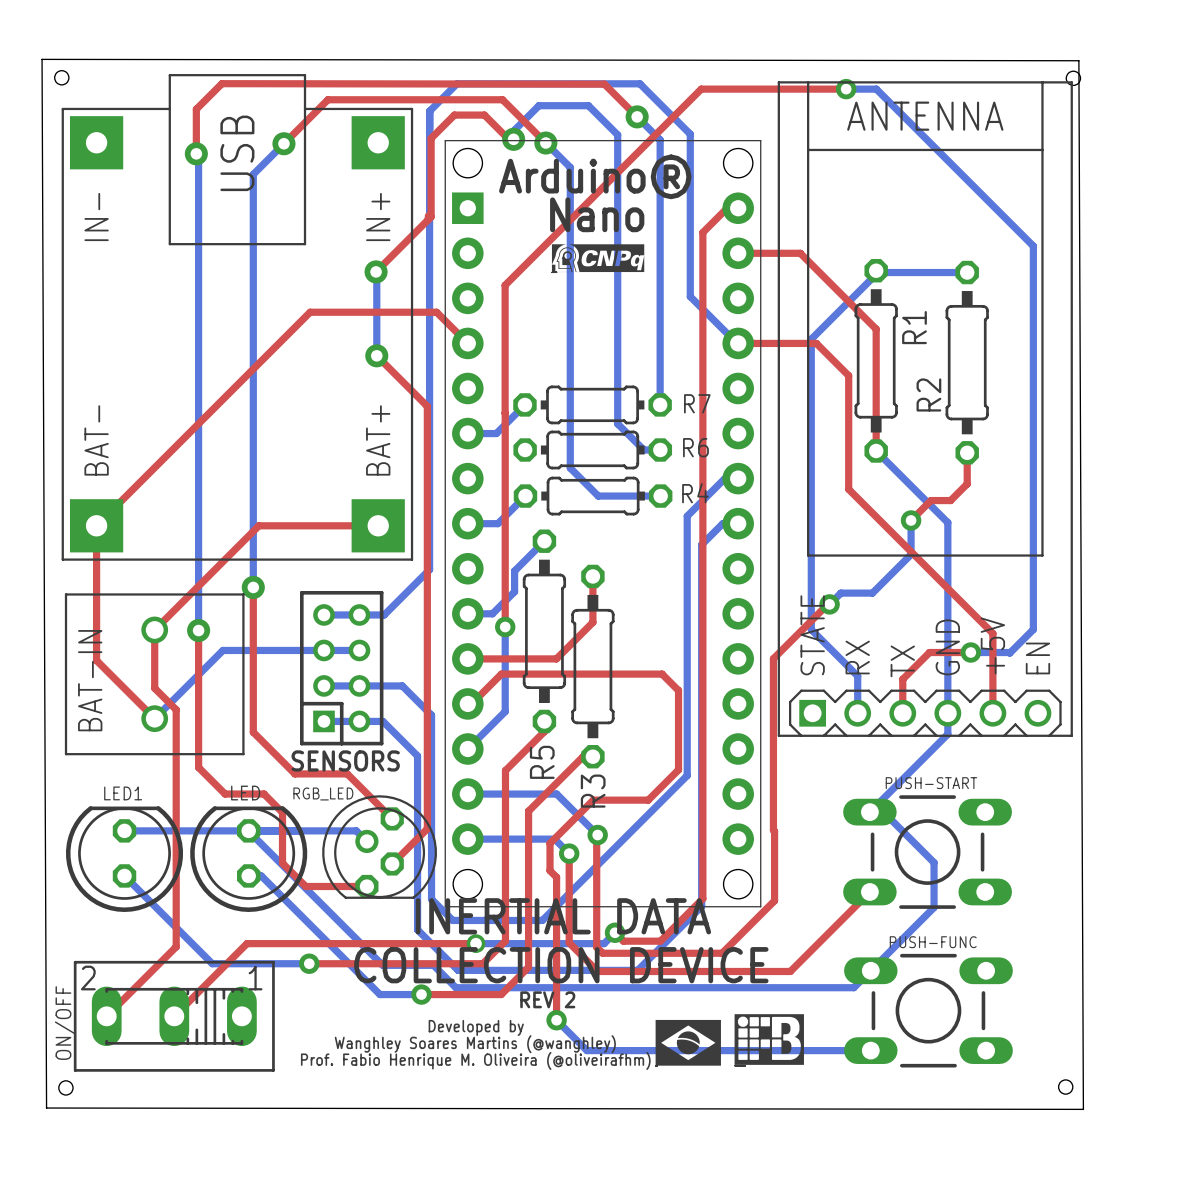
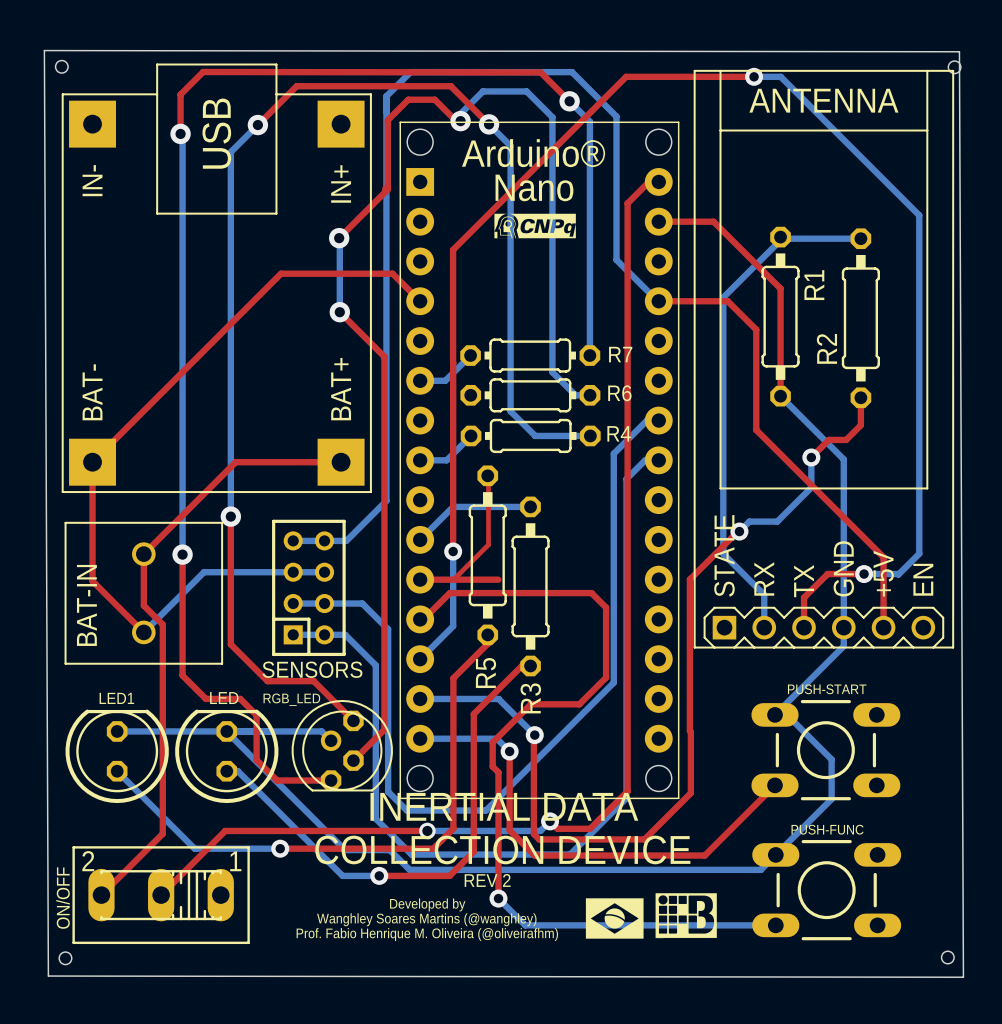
bottom track: (544, 541) (514, 571) (514, 591) (492, 613) (467, 613) -> (530, 506) (453, 506) (420, 539)
top track: none -> (487, 475) (488, 544) (453, 579)
top track: (592, 576) (592, 622) (556, 658) -> none

